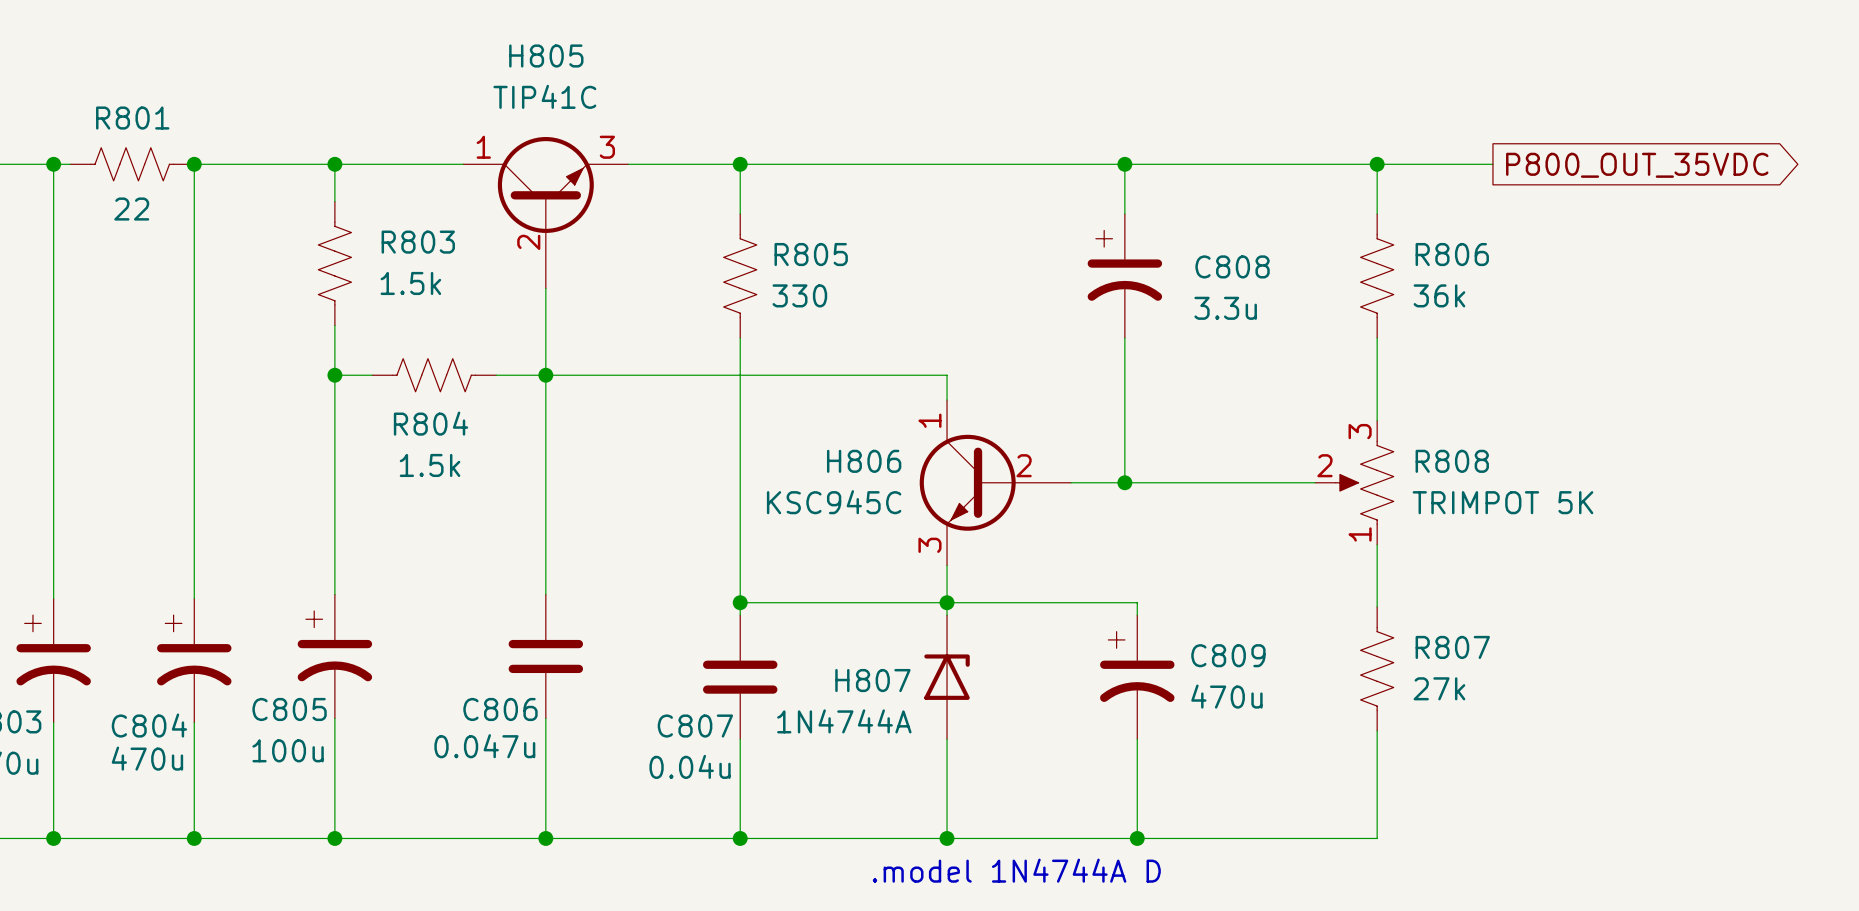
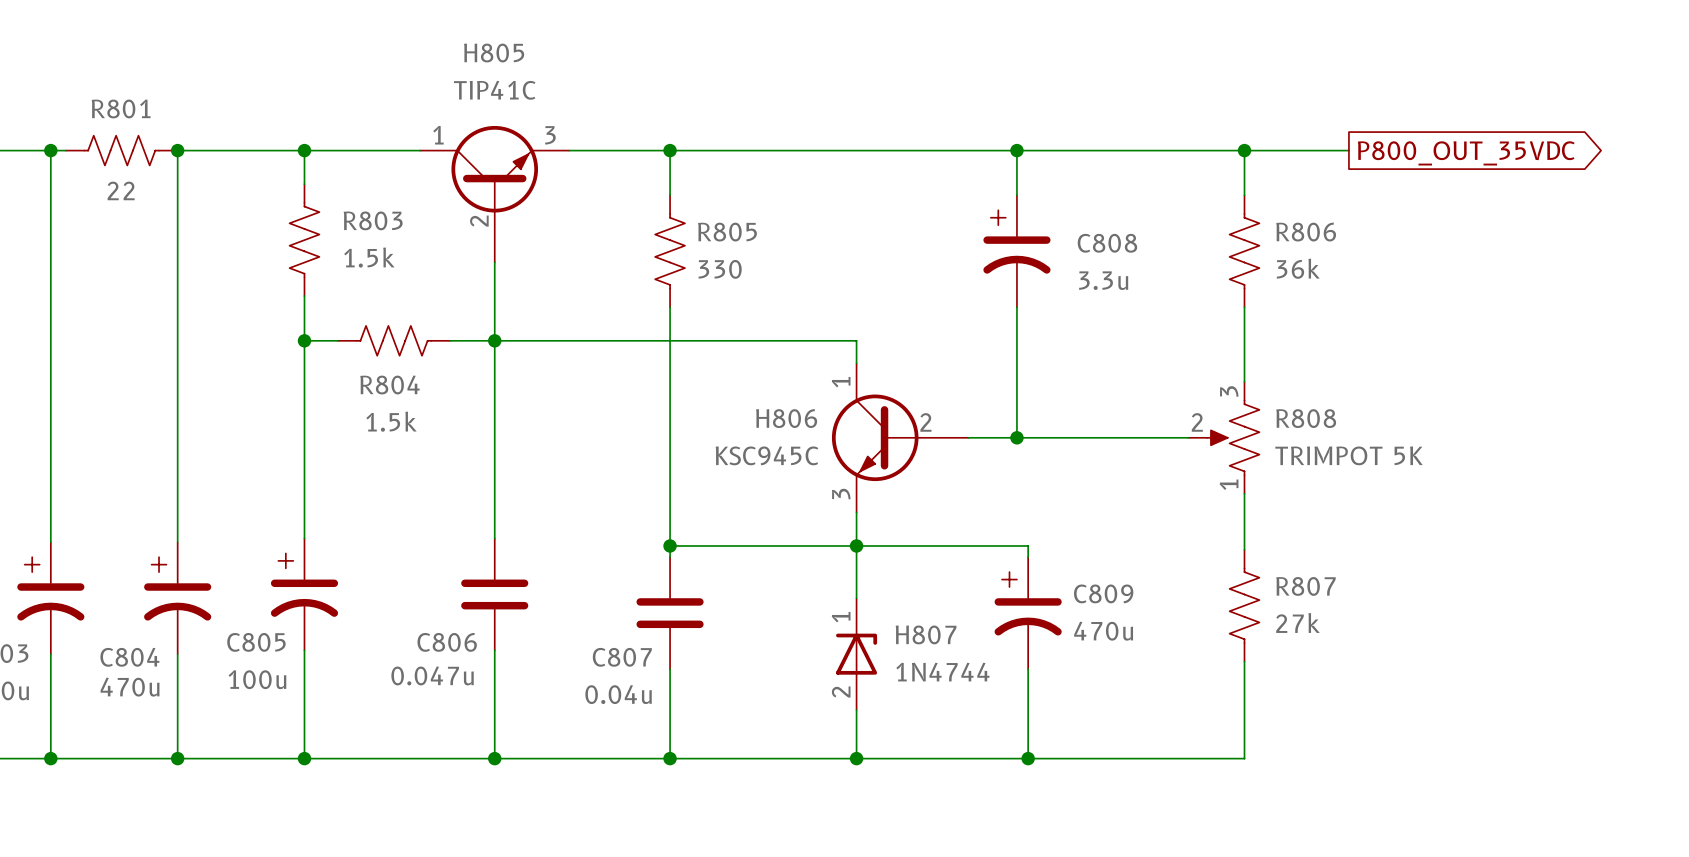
H807 position: (947, 677) -> (856, 654)
H807 name position: H807 (872, 680) -> H807 (926, 634)
H807 pin number: none -> 1 (841, 617)
H807 value: 1N4744A (844, 721) -> 1N4744 (942, 672)
H807 pin number: none -> 2 (841, 692)
text: .model 1N4744A D (1016, 870) -> none

